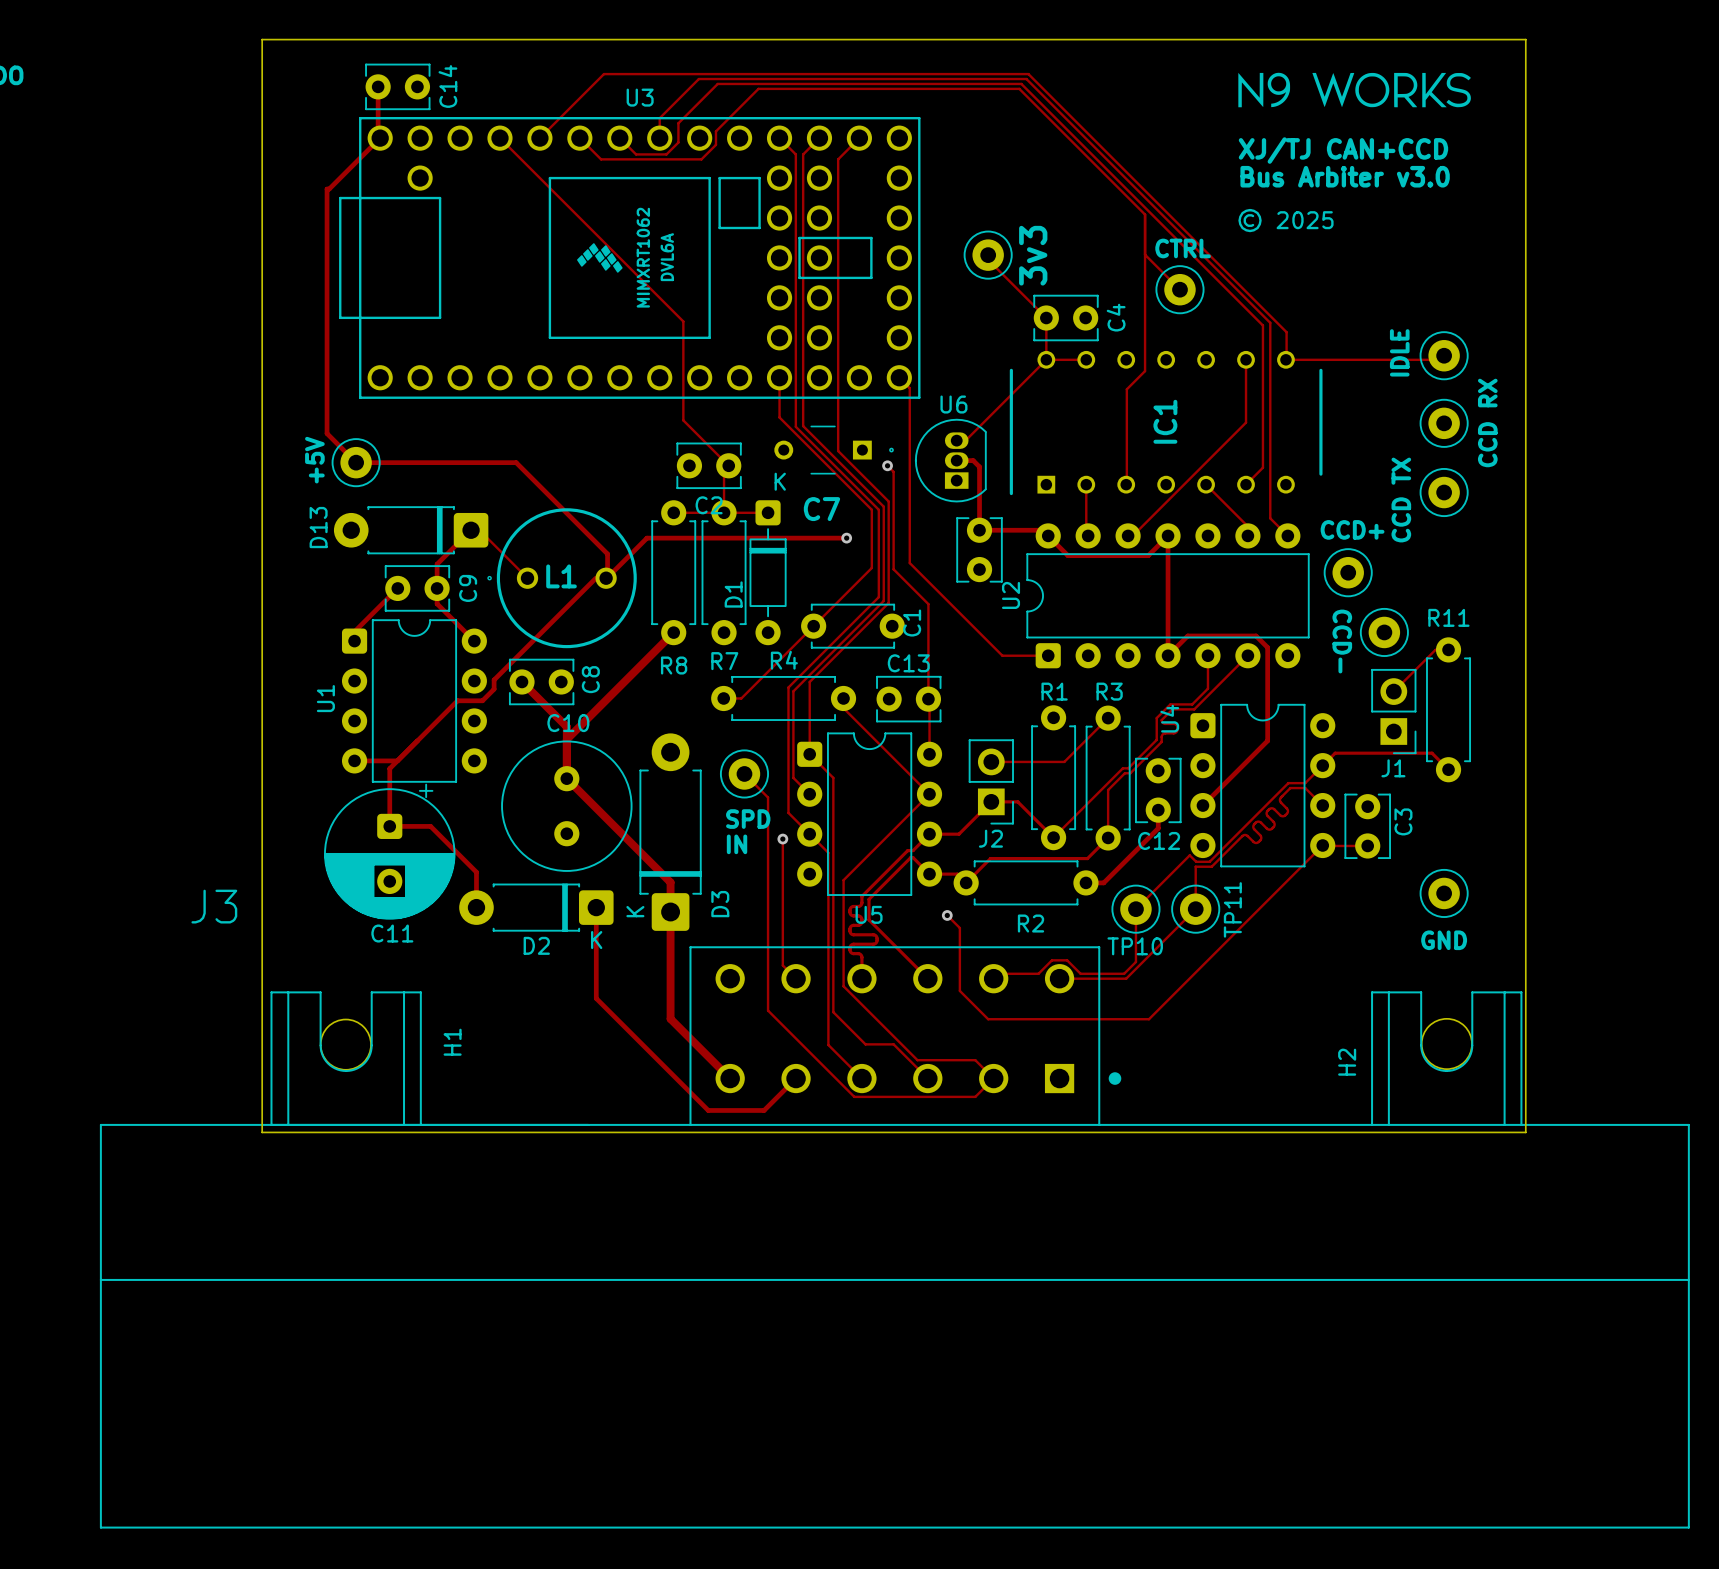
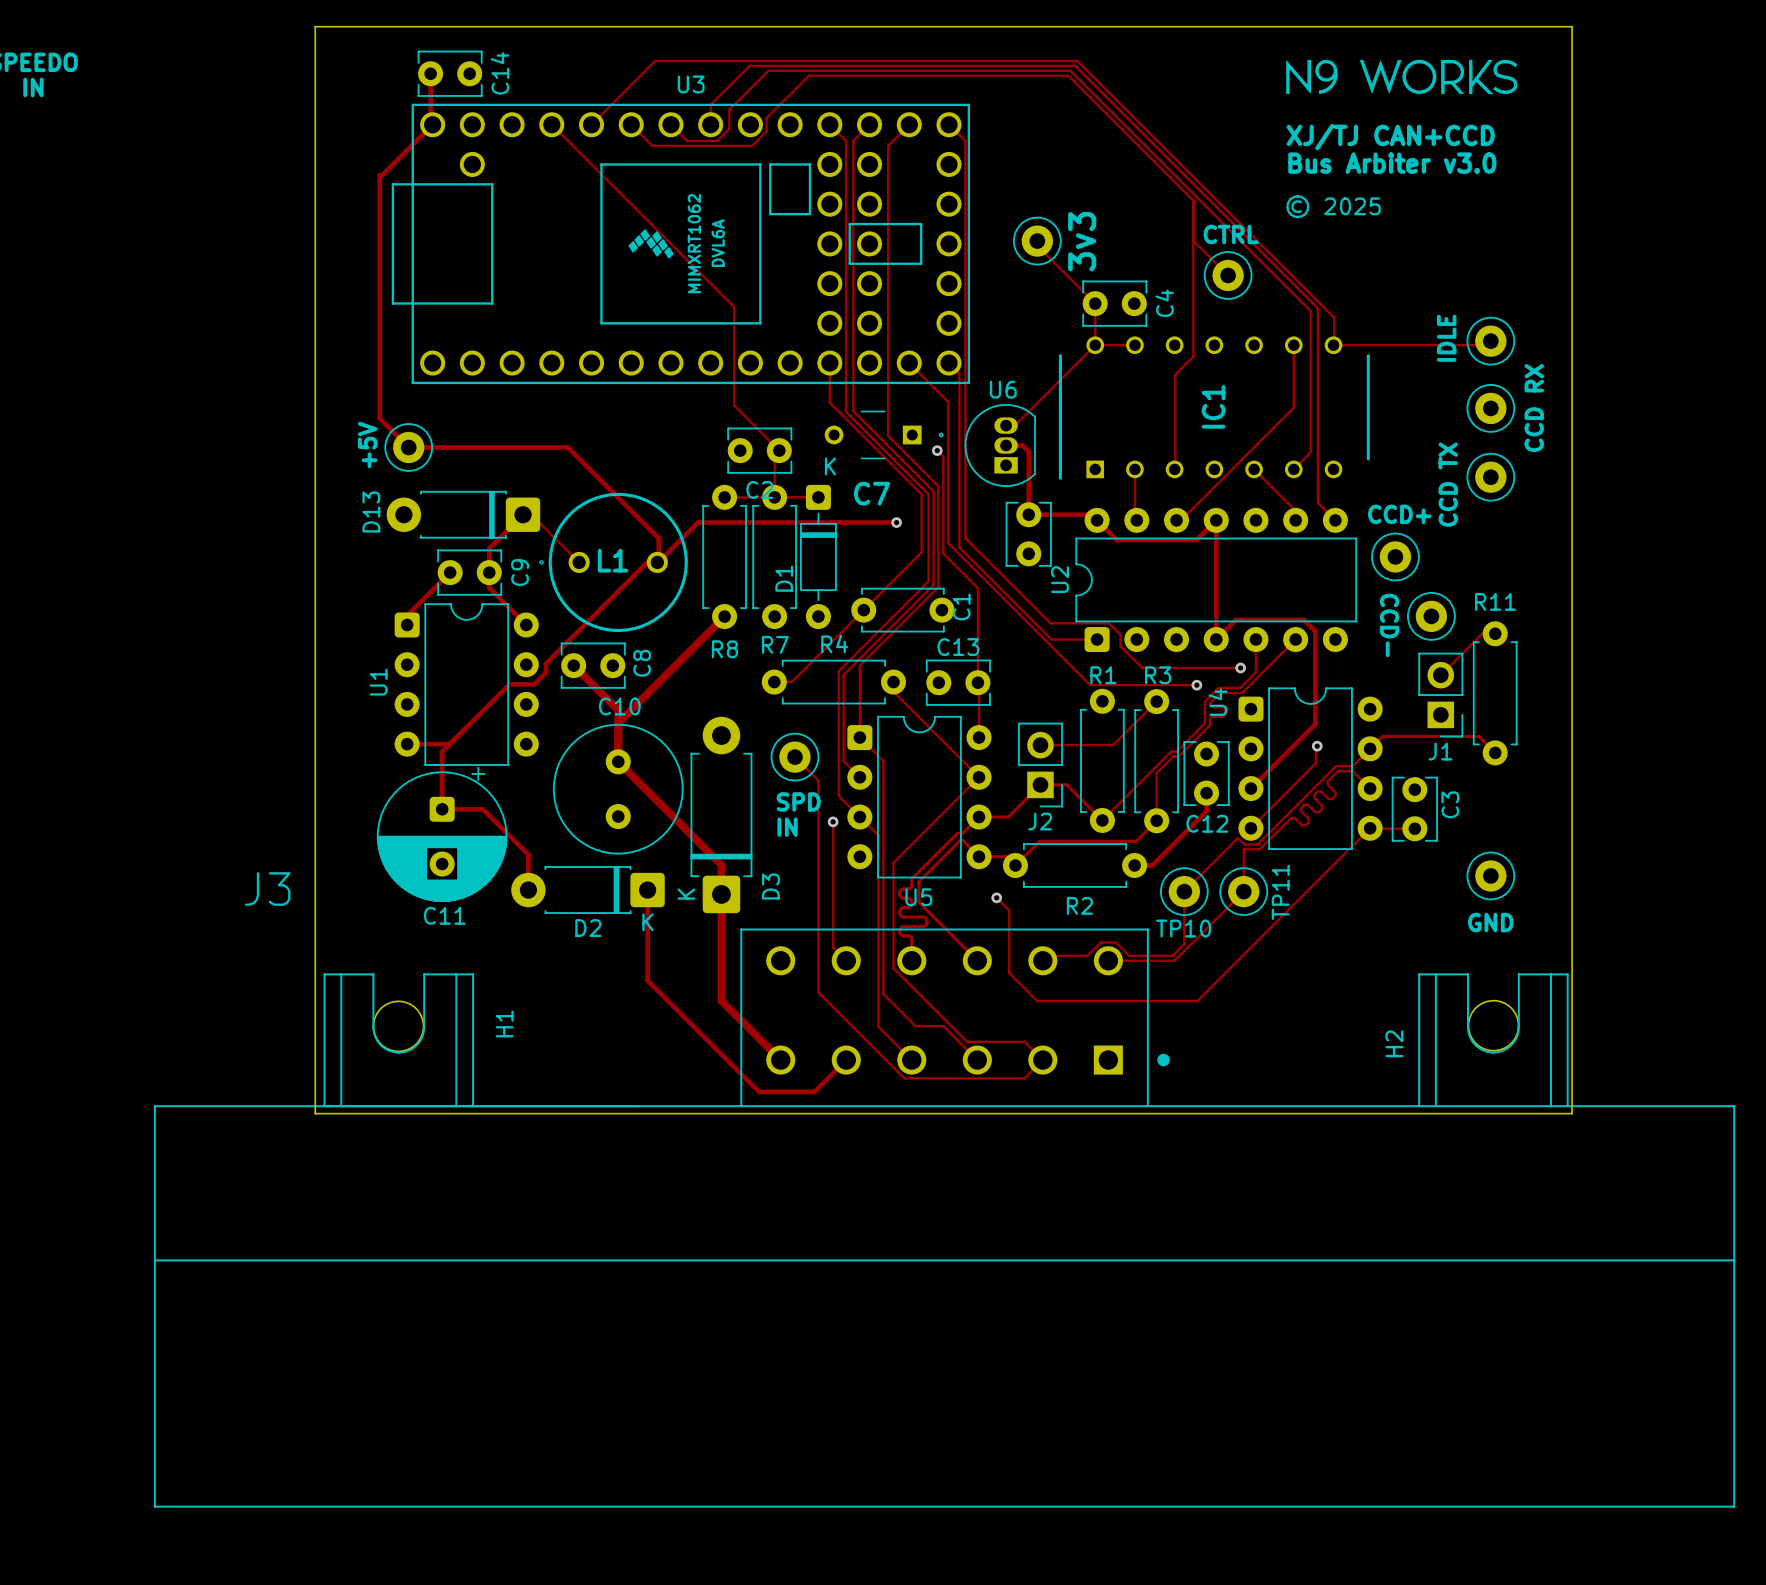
track: none -> (948, 124) (965, 141) (965, 538) (1050, 623) (1108, 623) (1120, 634) (1120, 646) (1142, 667) (1240, 667)
track: none -> (909, 363) (948, 401) (948, 543) (1090, 685) (1196, 685)
via: none -> (1240, 667)
via: none -> (1196, 685)
track: none -> (1317, 746) (1315, 763) (1250, 828)
via: none -> (1317, 746)

